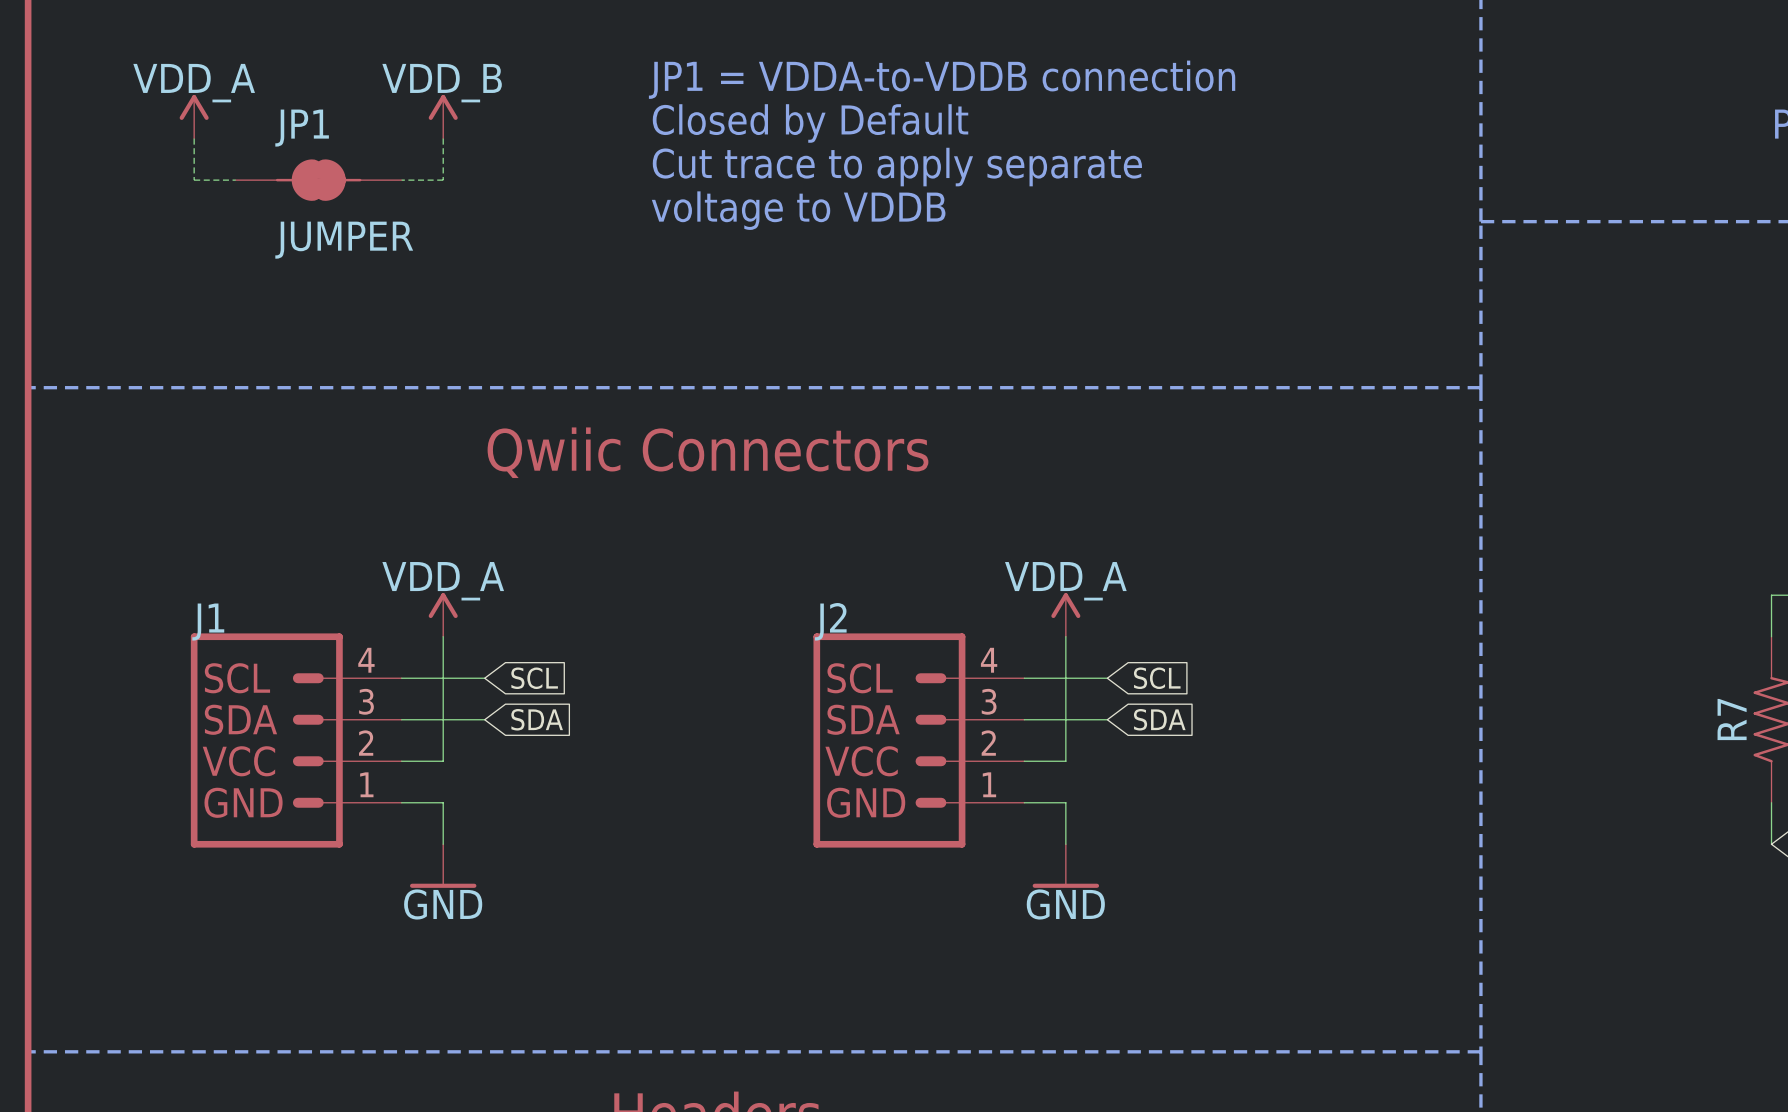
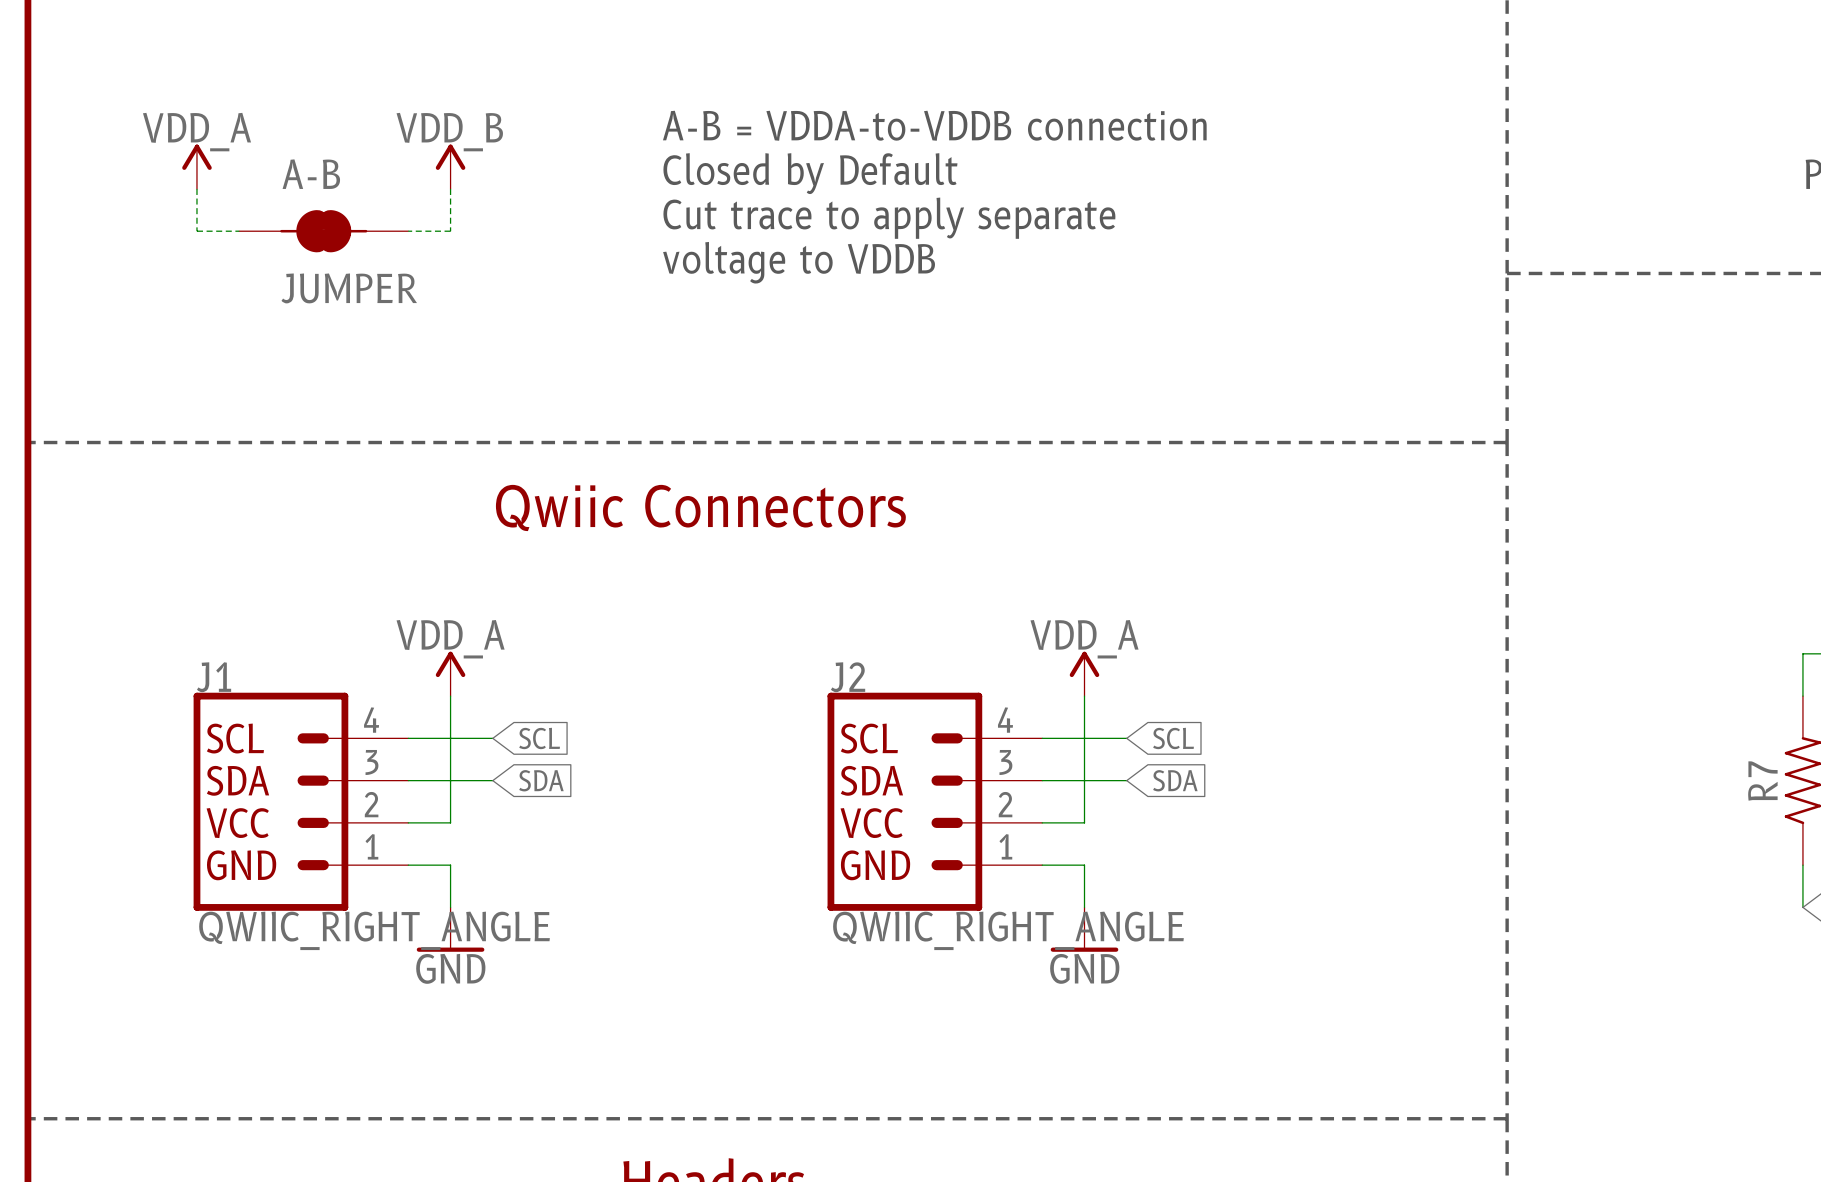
text: JP1 = VDDA-to-VDDB connection (942, 79) -> A-B = VDDA-to-VDDB connection (934, 125)
JP1 name: JP1 (302, 128) -> A-B (311, 174)
J1 value: none -> QWIIC_RIGHT_ANGLE (374, 930)
J2 value: none -> QWIIC_RIGHT_ANGLE (1008, 930)

